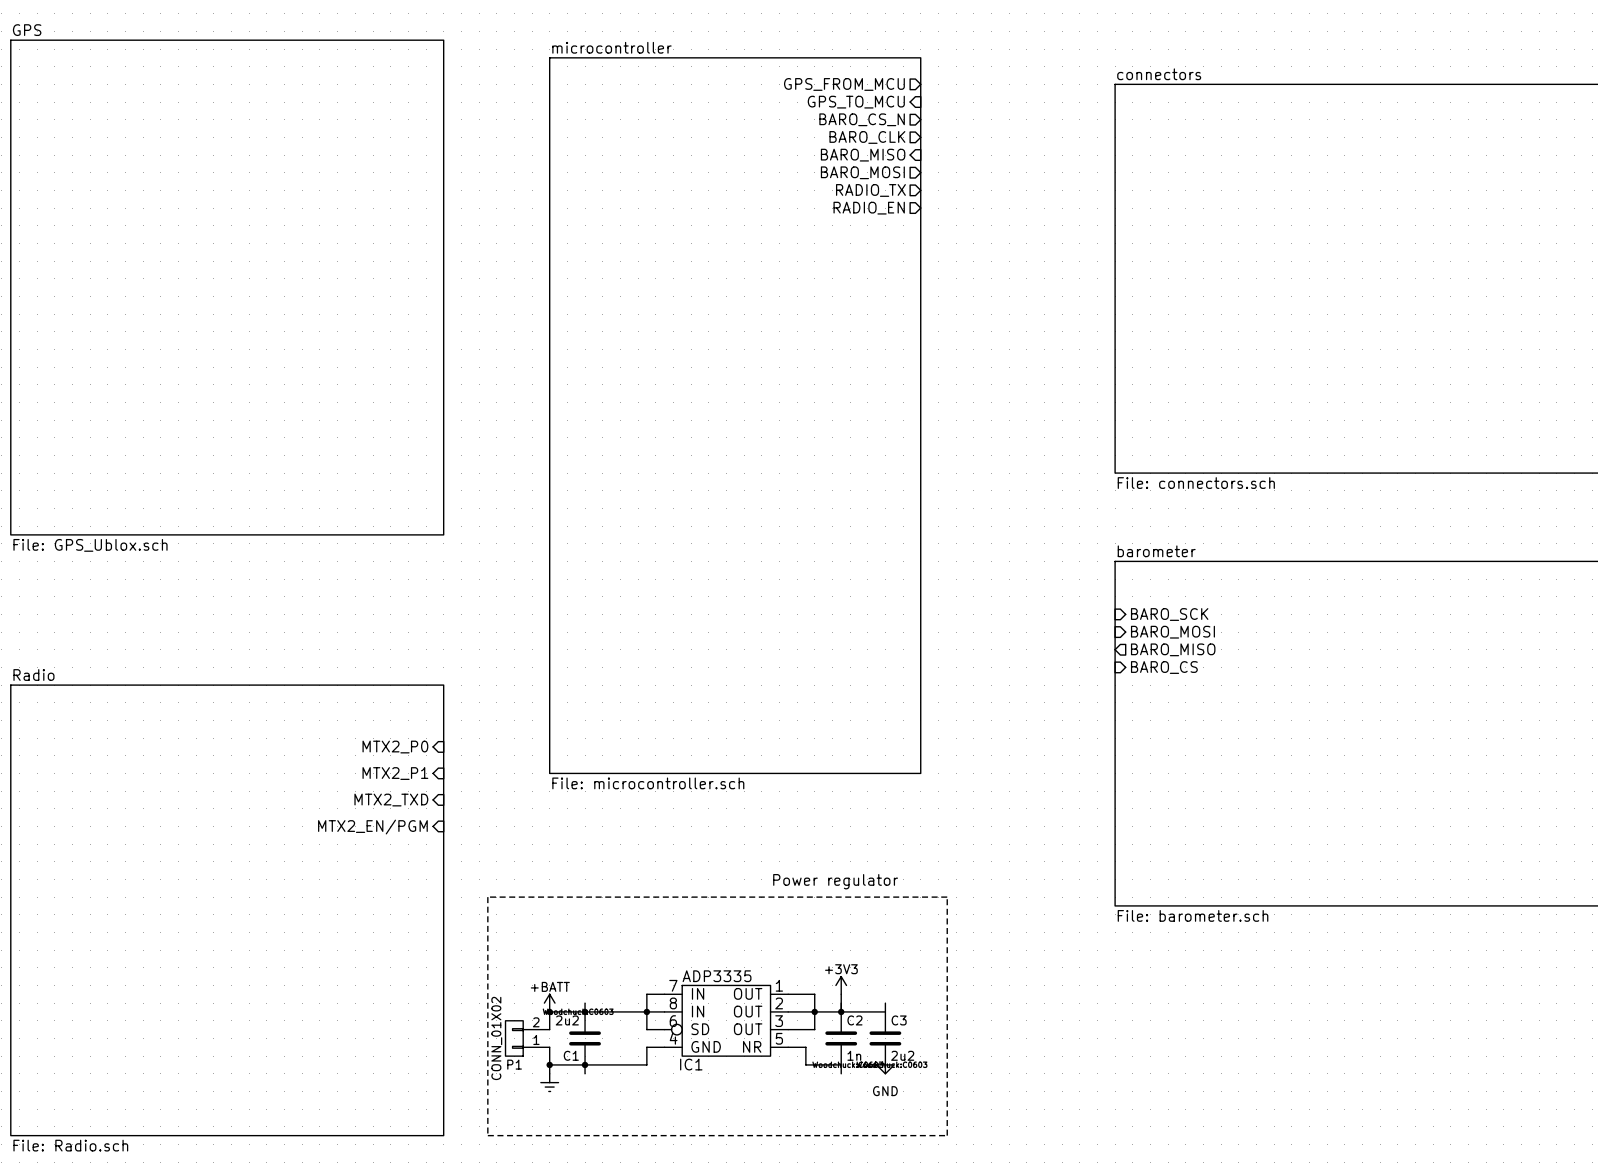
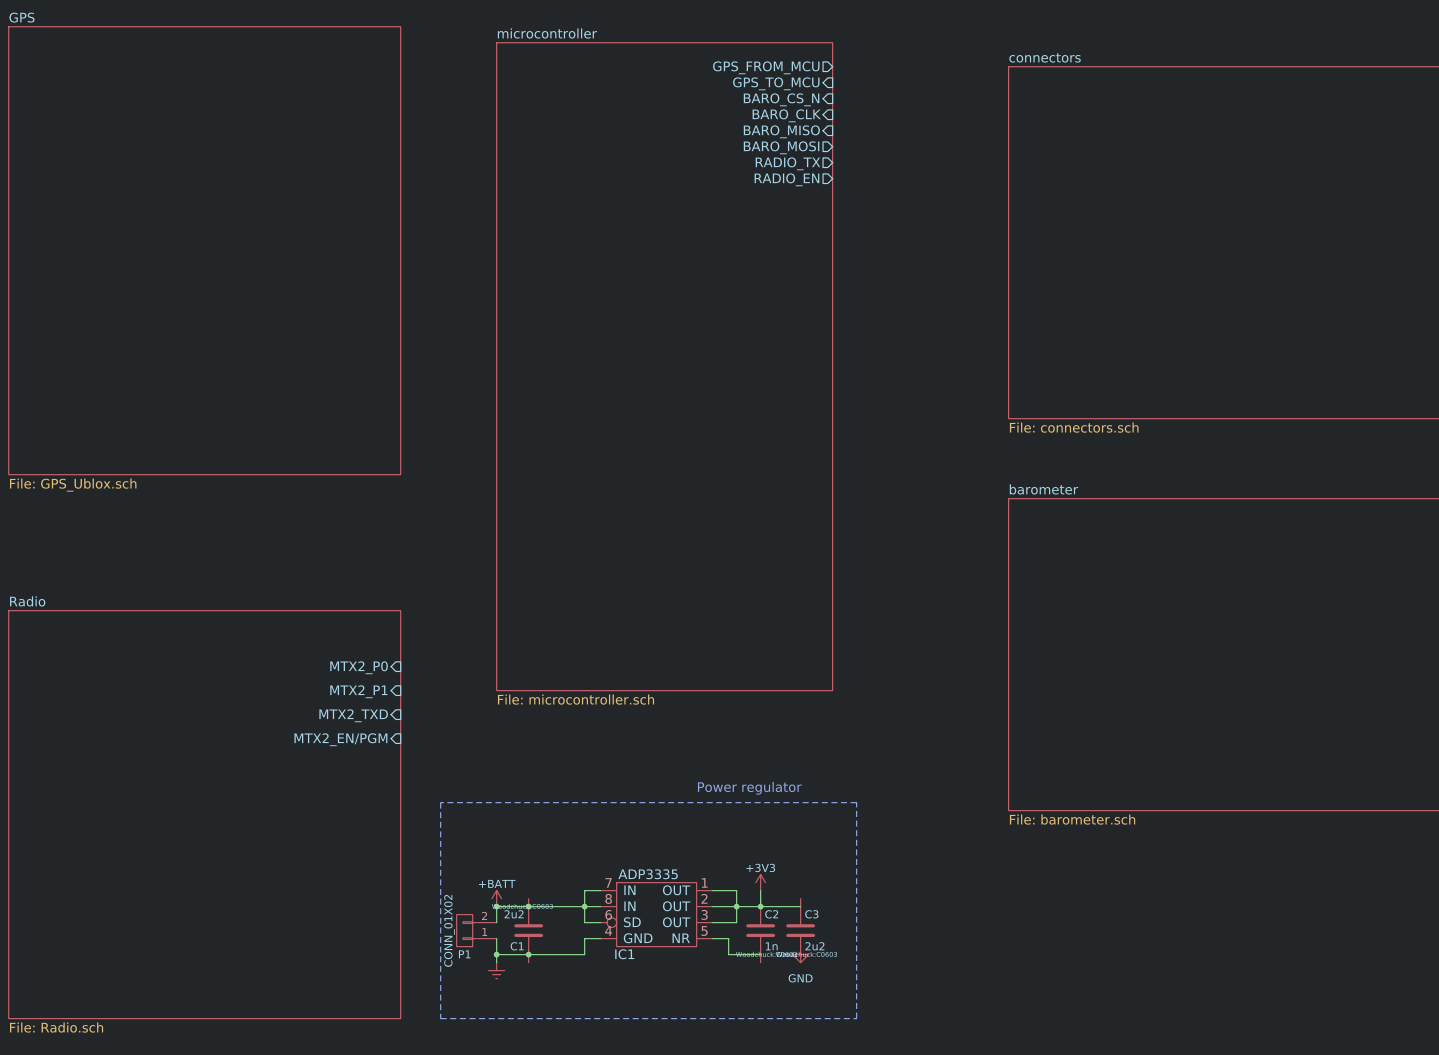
sheet pin shape: output (862, 119) -> input (781, 99)
sheet pin shape: output (867, 137) -> input (786, 115)
sheet pin: BARO_SCK (1169, 614) -> none
sheet pin: BARO_MOSI (1172, 632) -> none
sheet pin: BARO_MISO (1173, 649) -> none
sheet pin: BARO_CS (1164, 667) -> none

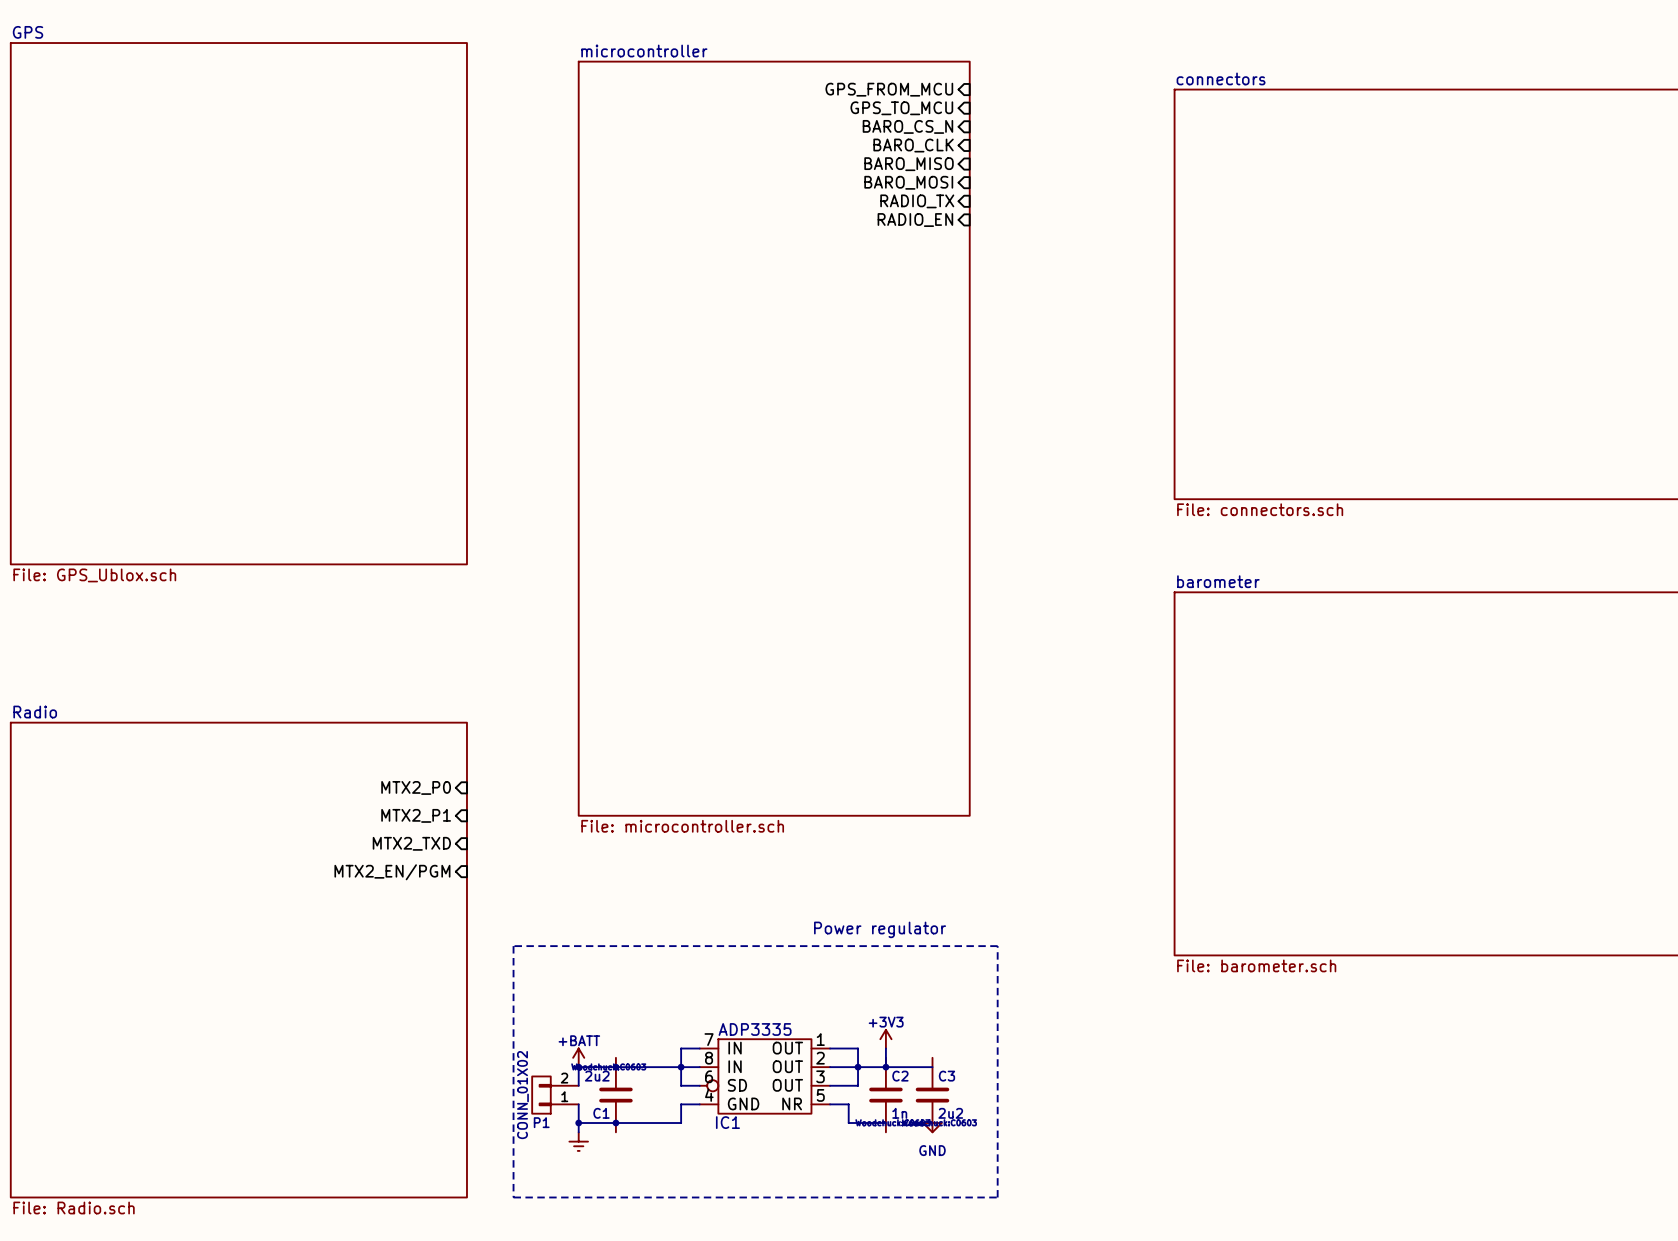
sheet pin shape: output (766, 67) -> input (889, 89)
sheet pin shape: output (781, 147) -> input (908, 182)
sheet pin shape: output (787, 163) -> input (917, 201)
sheet pin shape: output (786, 179) -> input (915, 220)

